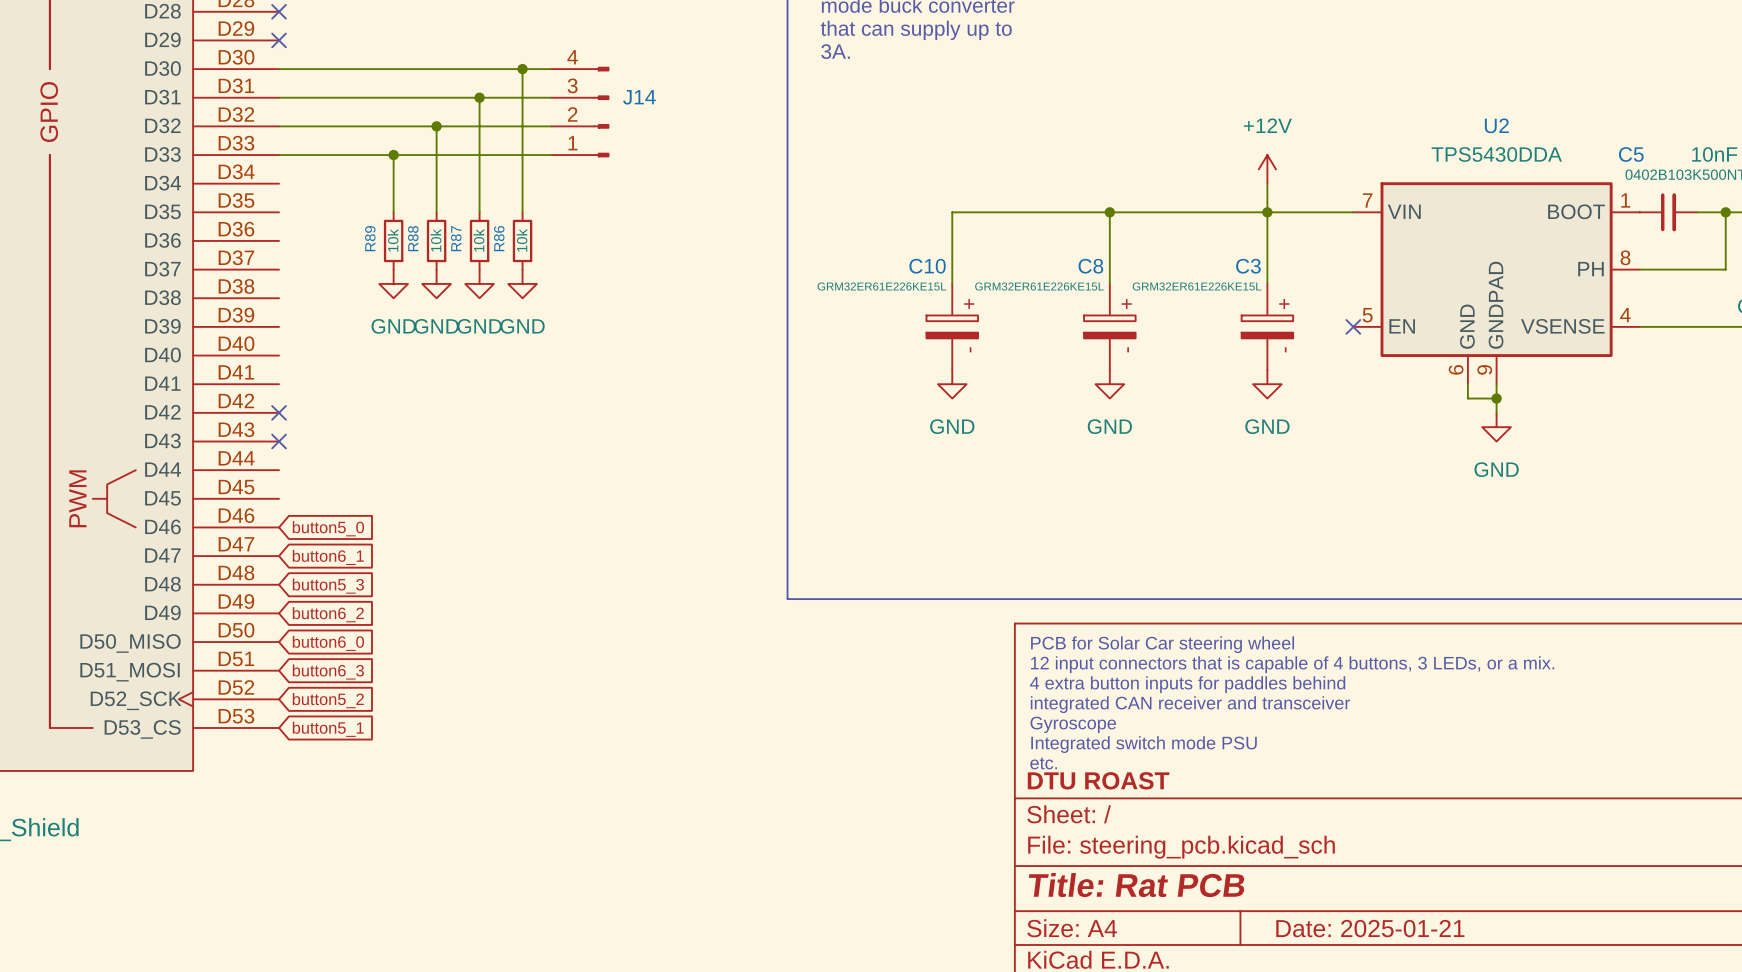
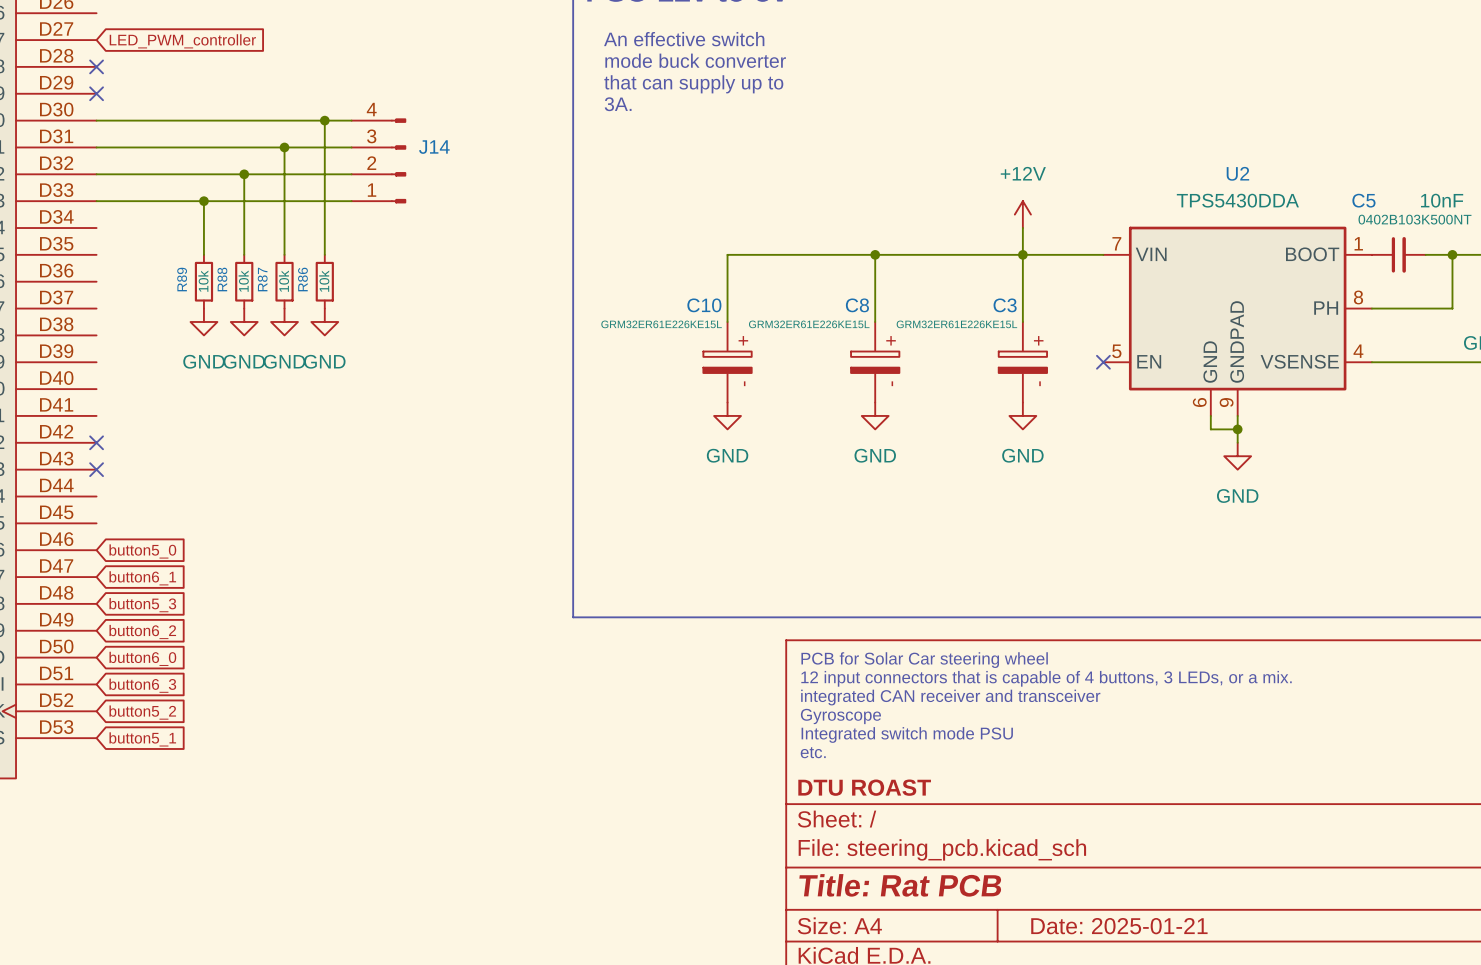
text: 4 extra button inputs for paddles behind (1187, 684) -> integrated CAN receiver and transceiver (950, 697)
text: integrated CAN receiver and transceiver (1190, 704) -> Gyroscope (840, 716)
text: Gyroscope (1073, 724) -> Integrated switch mode PSU (907, 734)
text: Integrated switch mode PSU (1144, 744) -> etc. (813, 752)
text: etc. (1043, 763) -> none

